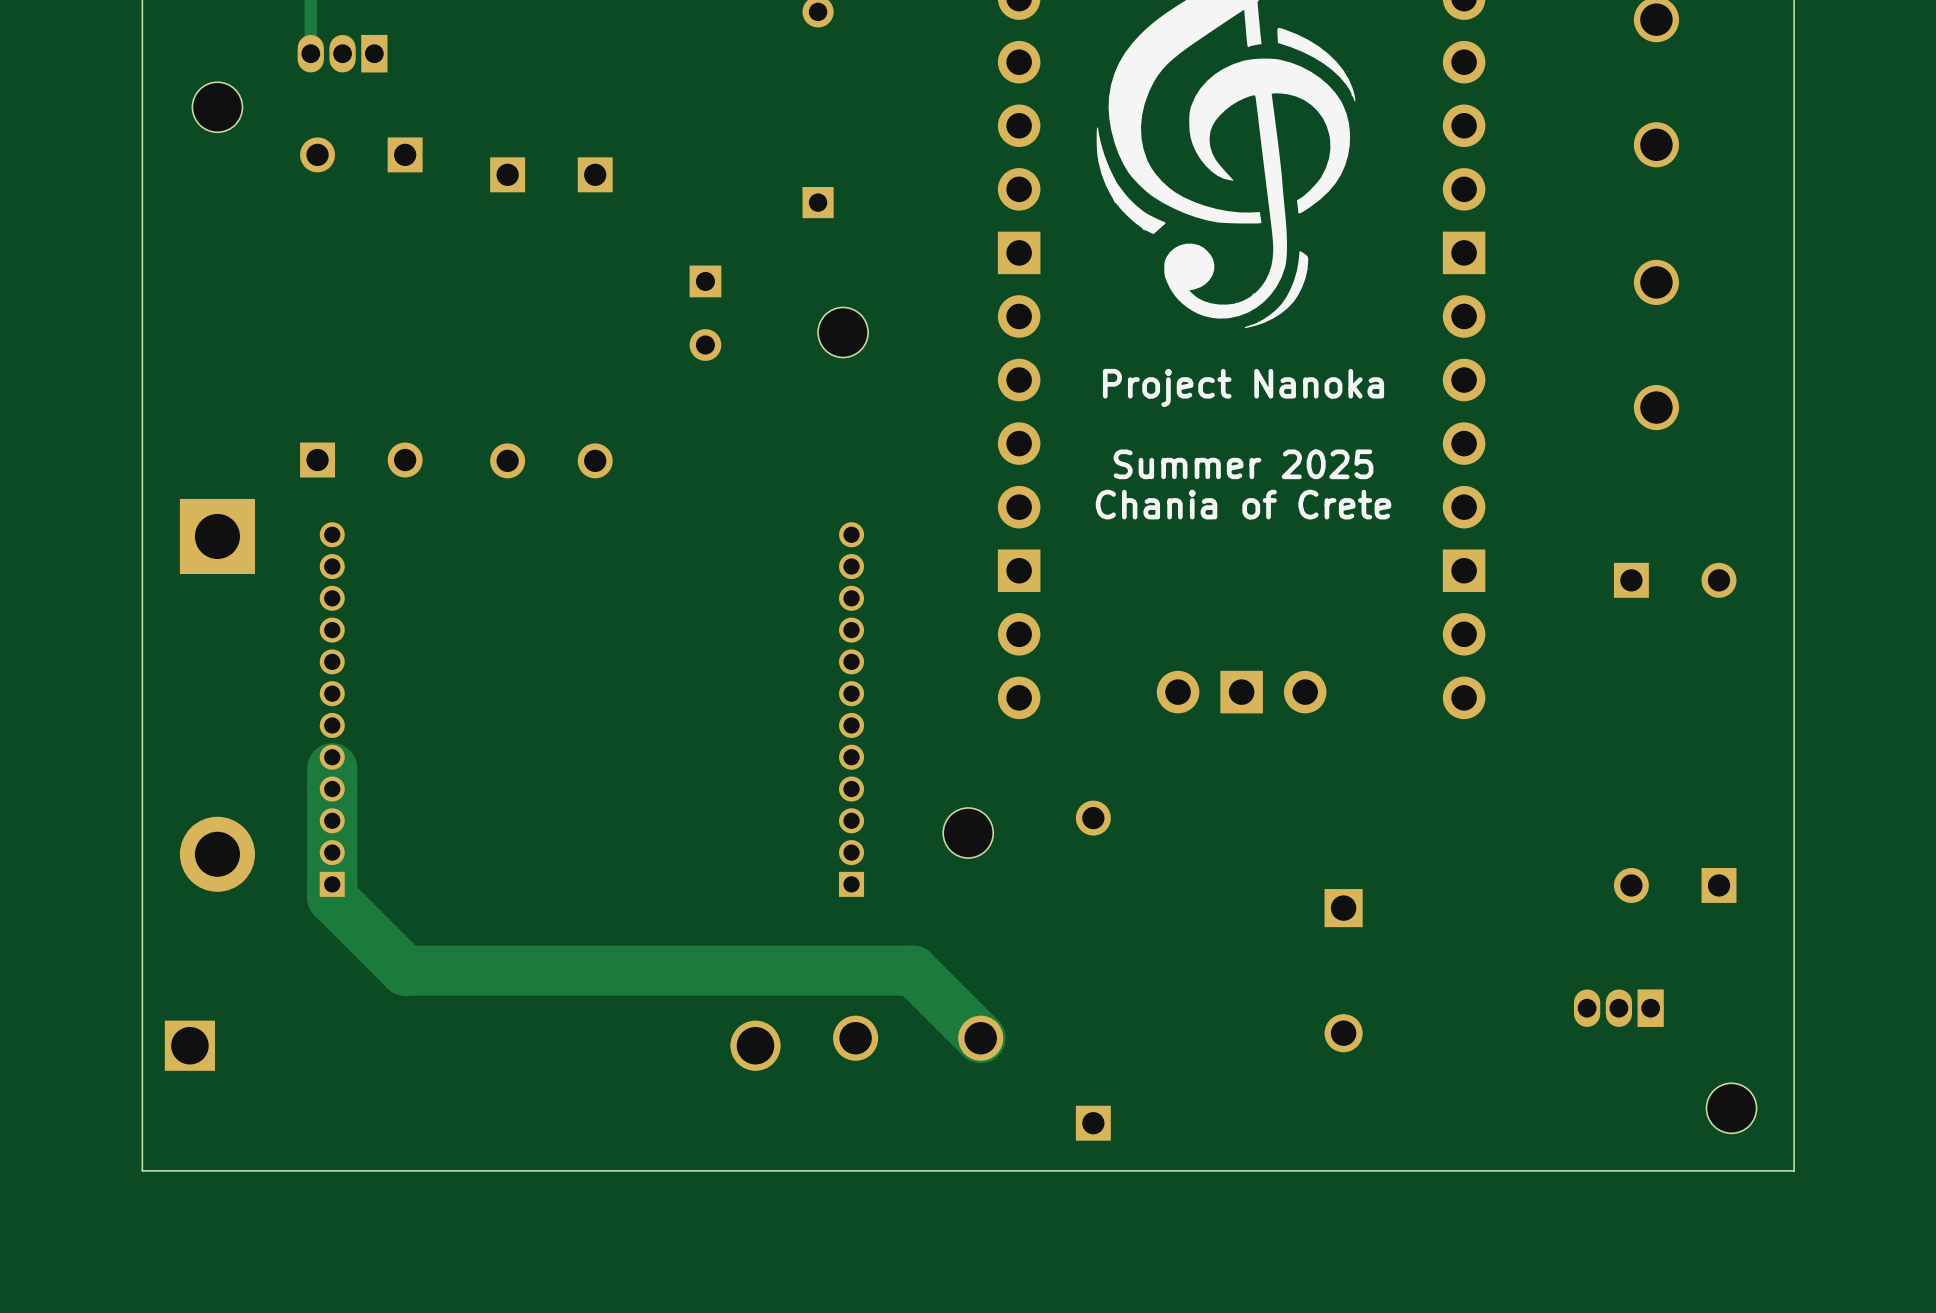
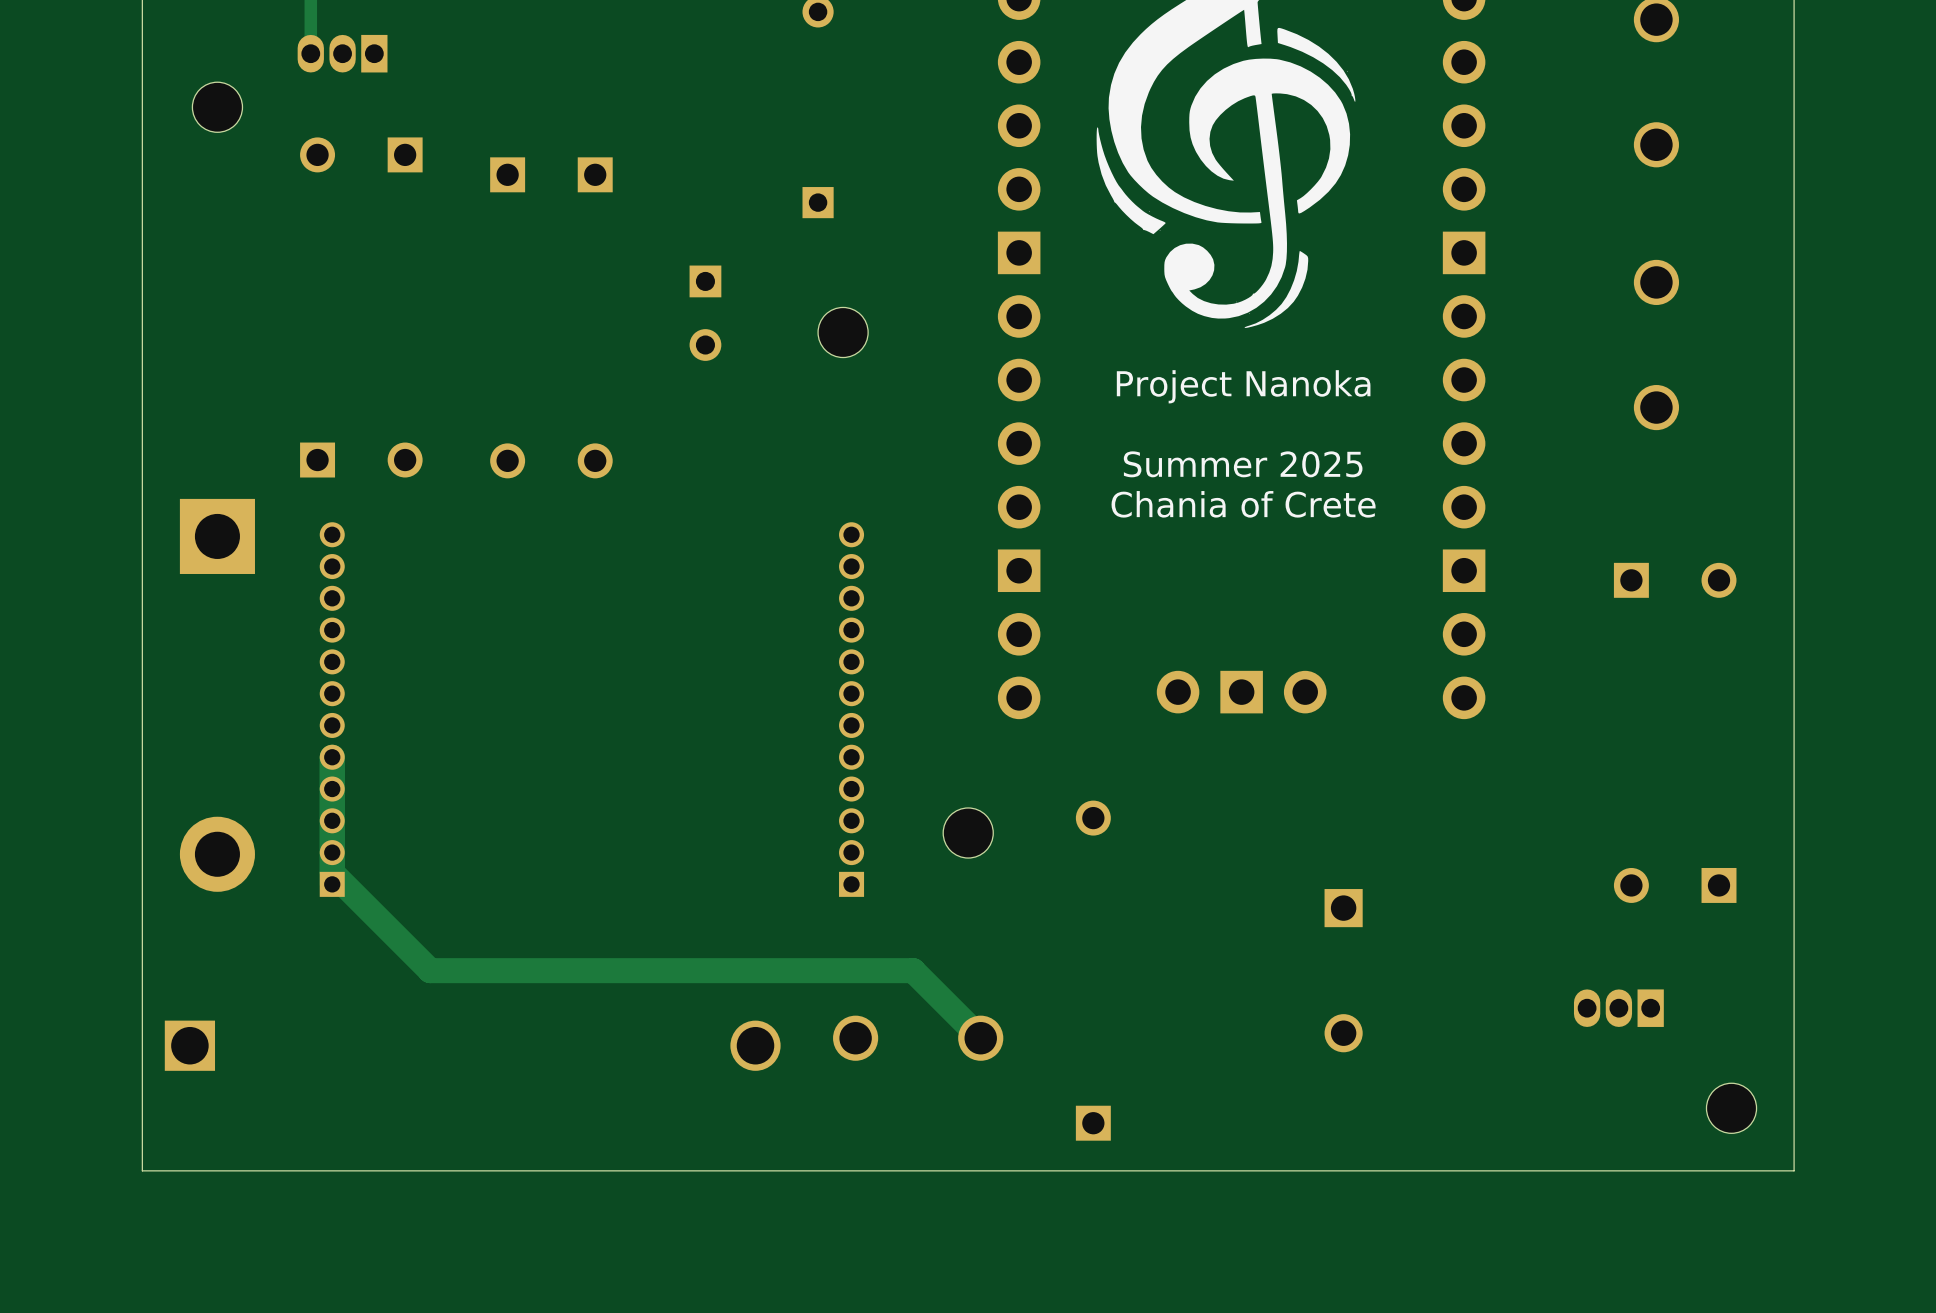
track: (332, 768) (332, 897) (405, 970) (430, 970) -> (332, 872) (430, 970)
track width: thick (430, 970) (913, 970) (980, 1038) -> thin (430, 970) (913, 970) (980, 1038)

